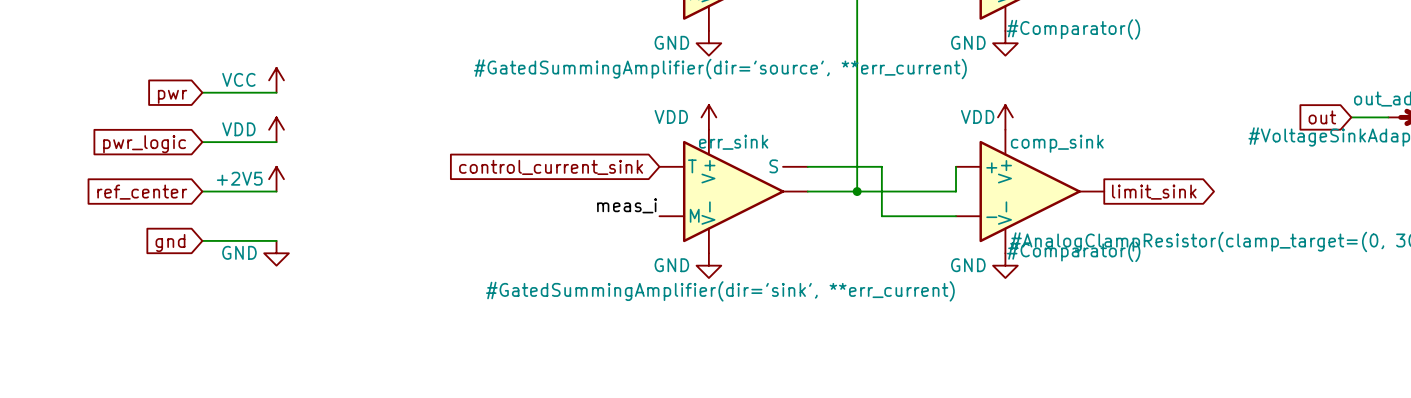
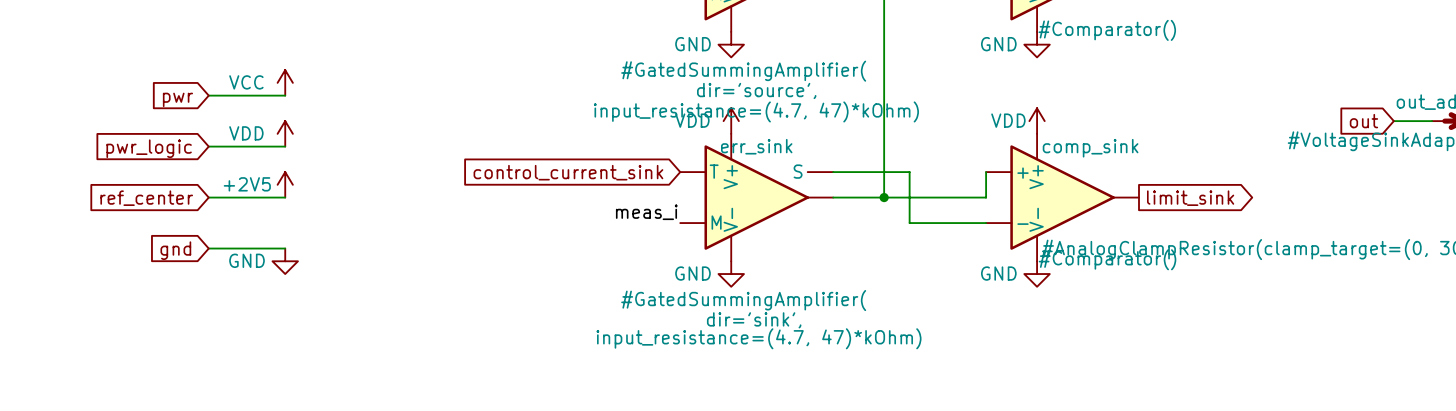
part value: #GatedSummingAmplifier(dir='source', **err_current) (720, 69) -> #GatedSummingAmplifier( (743, 71)
part text: none -> dir='source', (756, 90)
part text: none -> input_resistance=(4.7, 47)*kOhm) (756, 111)
err_sink value: #GatedSummingAmplifier(dir='sink', **err_current) (720, 291) -> #GatedSummingAmplifier( (743, 300)
err_sink text: none -> dir='sink', (754, 320)
err_sink text: none -> input_resistance=(4.7, 47)*kOhm) (758, 338)

